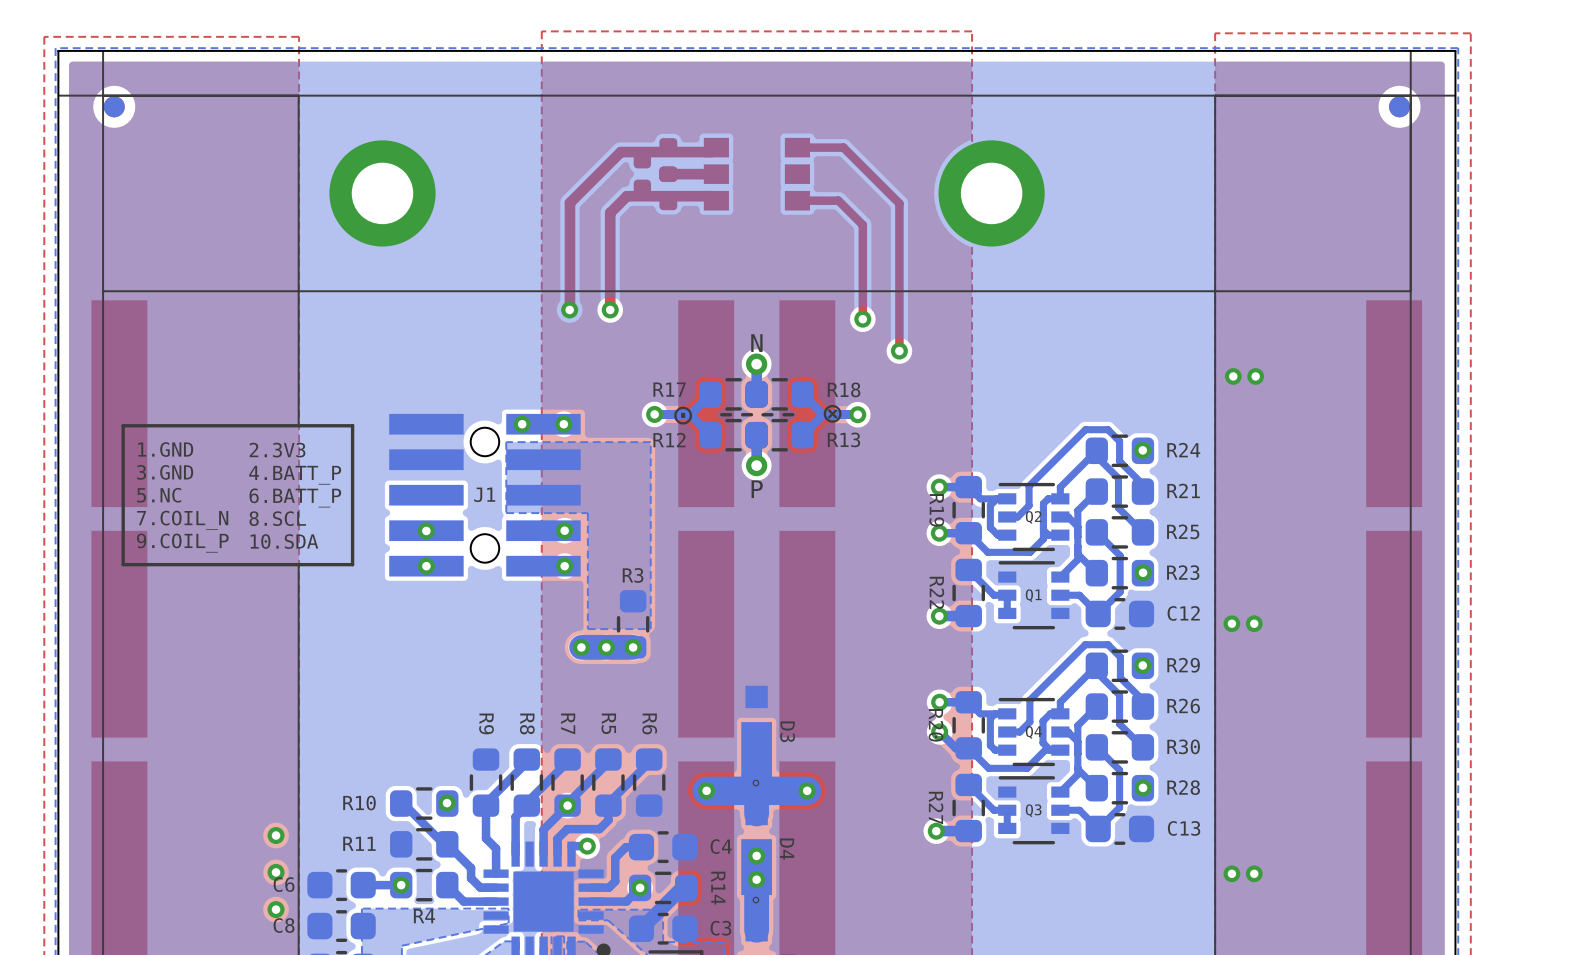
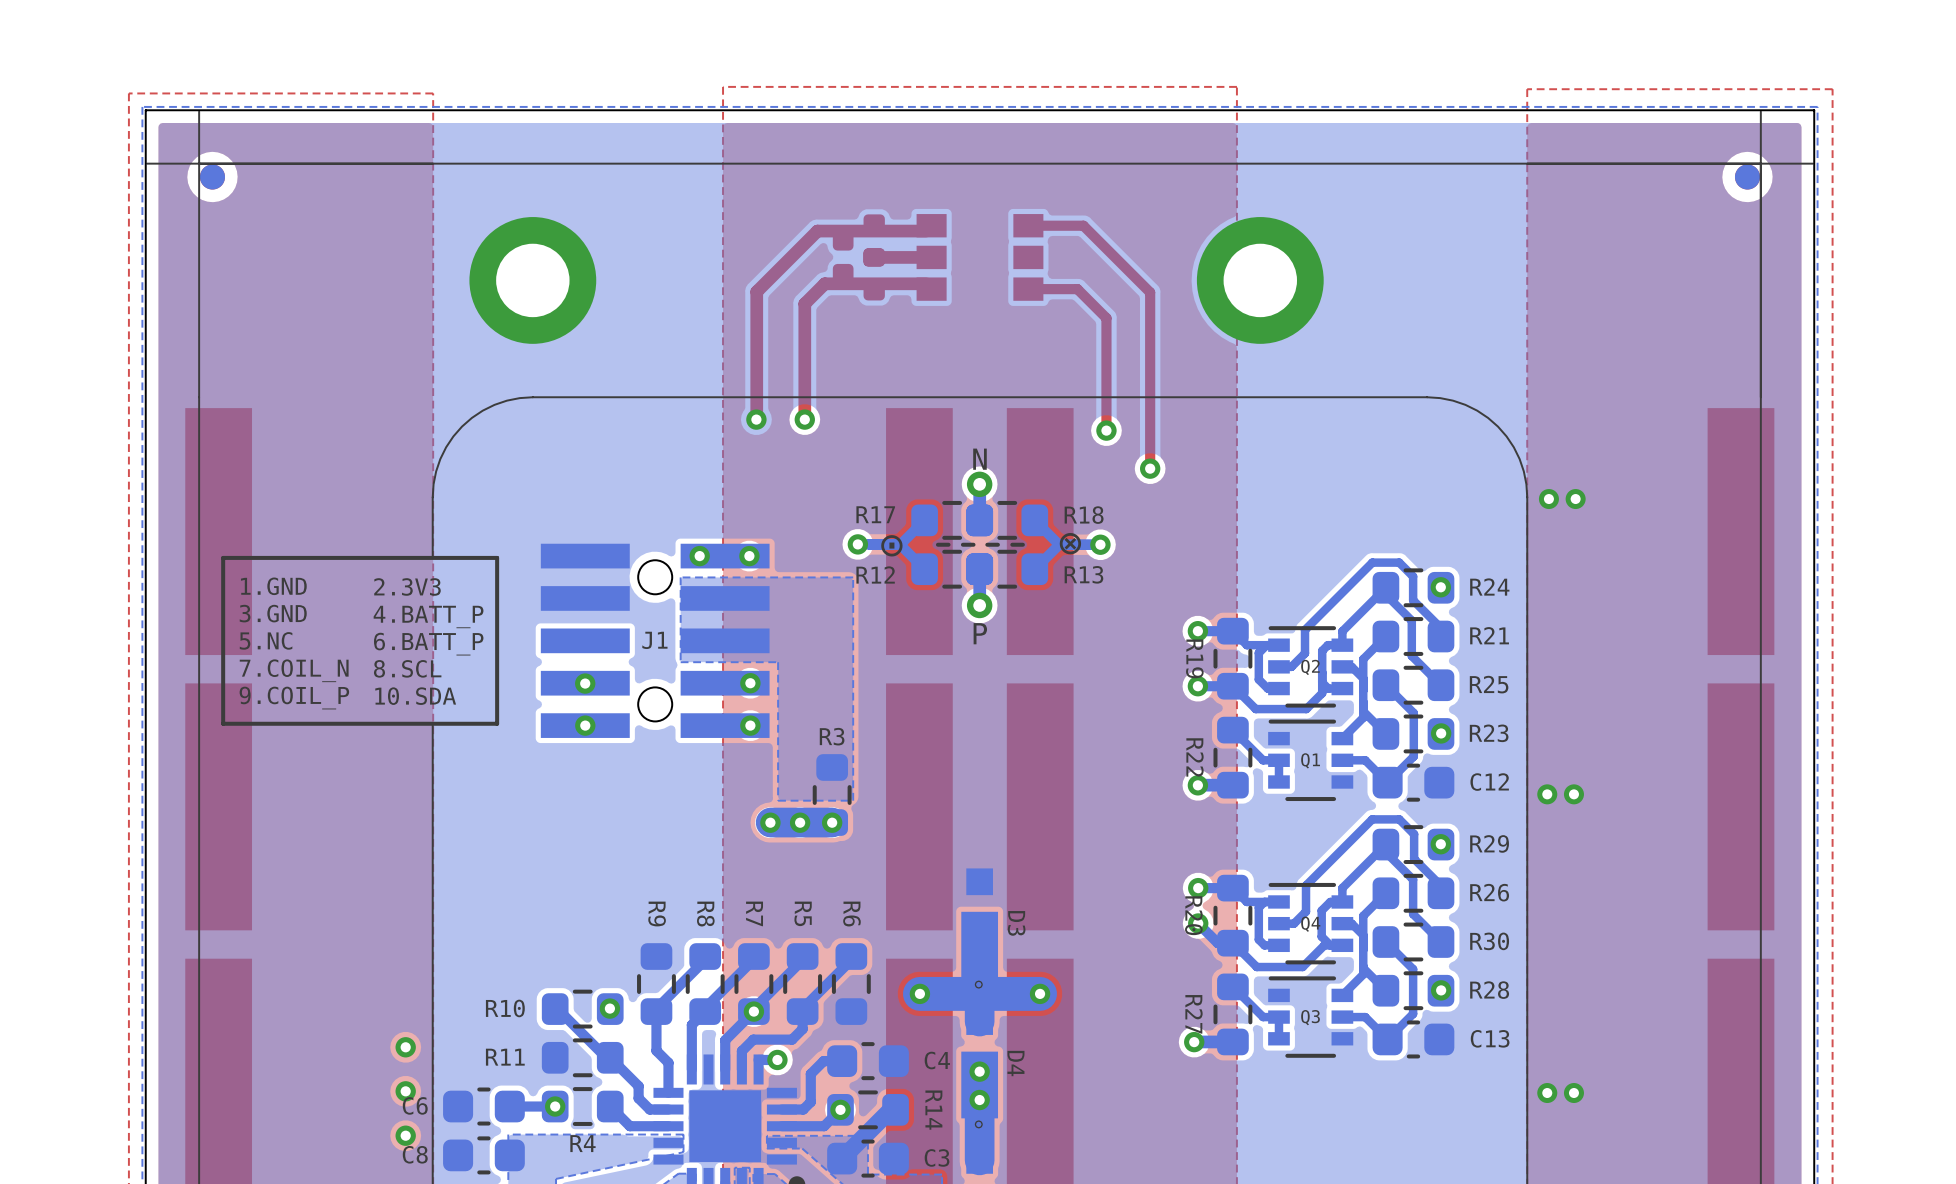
line: (298, 95) (298, 375) -> (532, 397) (519, 398) (494, 404) (482, 410) (462, 426) (453, 436) (440, 459) (436, 471) (432, 497)
line: (1215, 95) (1215, 375) -> none
line: (382, 291) (103, 291) -> none
line: (1410, 291) (1131, 291) -> (1527, 497) (1523, 471) (1519, 459) (1506, 436) (1497, 426) (1488, 417) (1465, 404) (1440, 398) (1427, 397)

